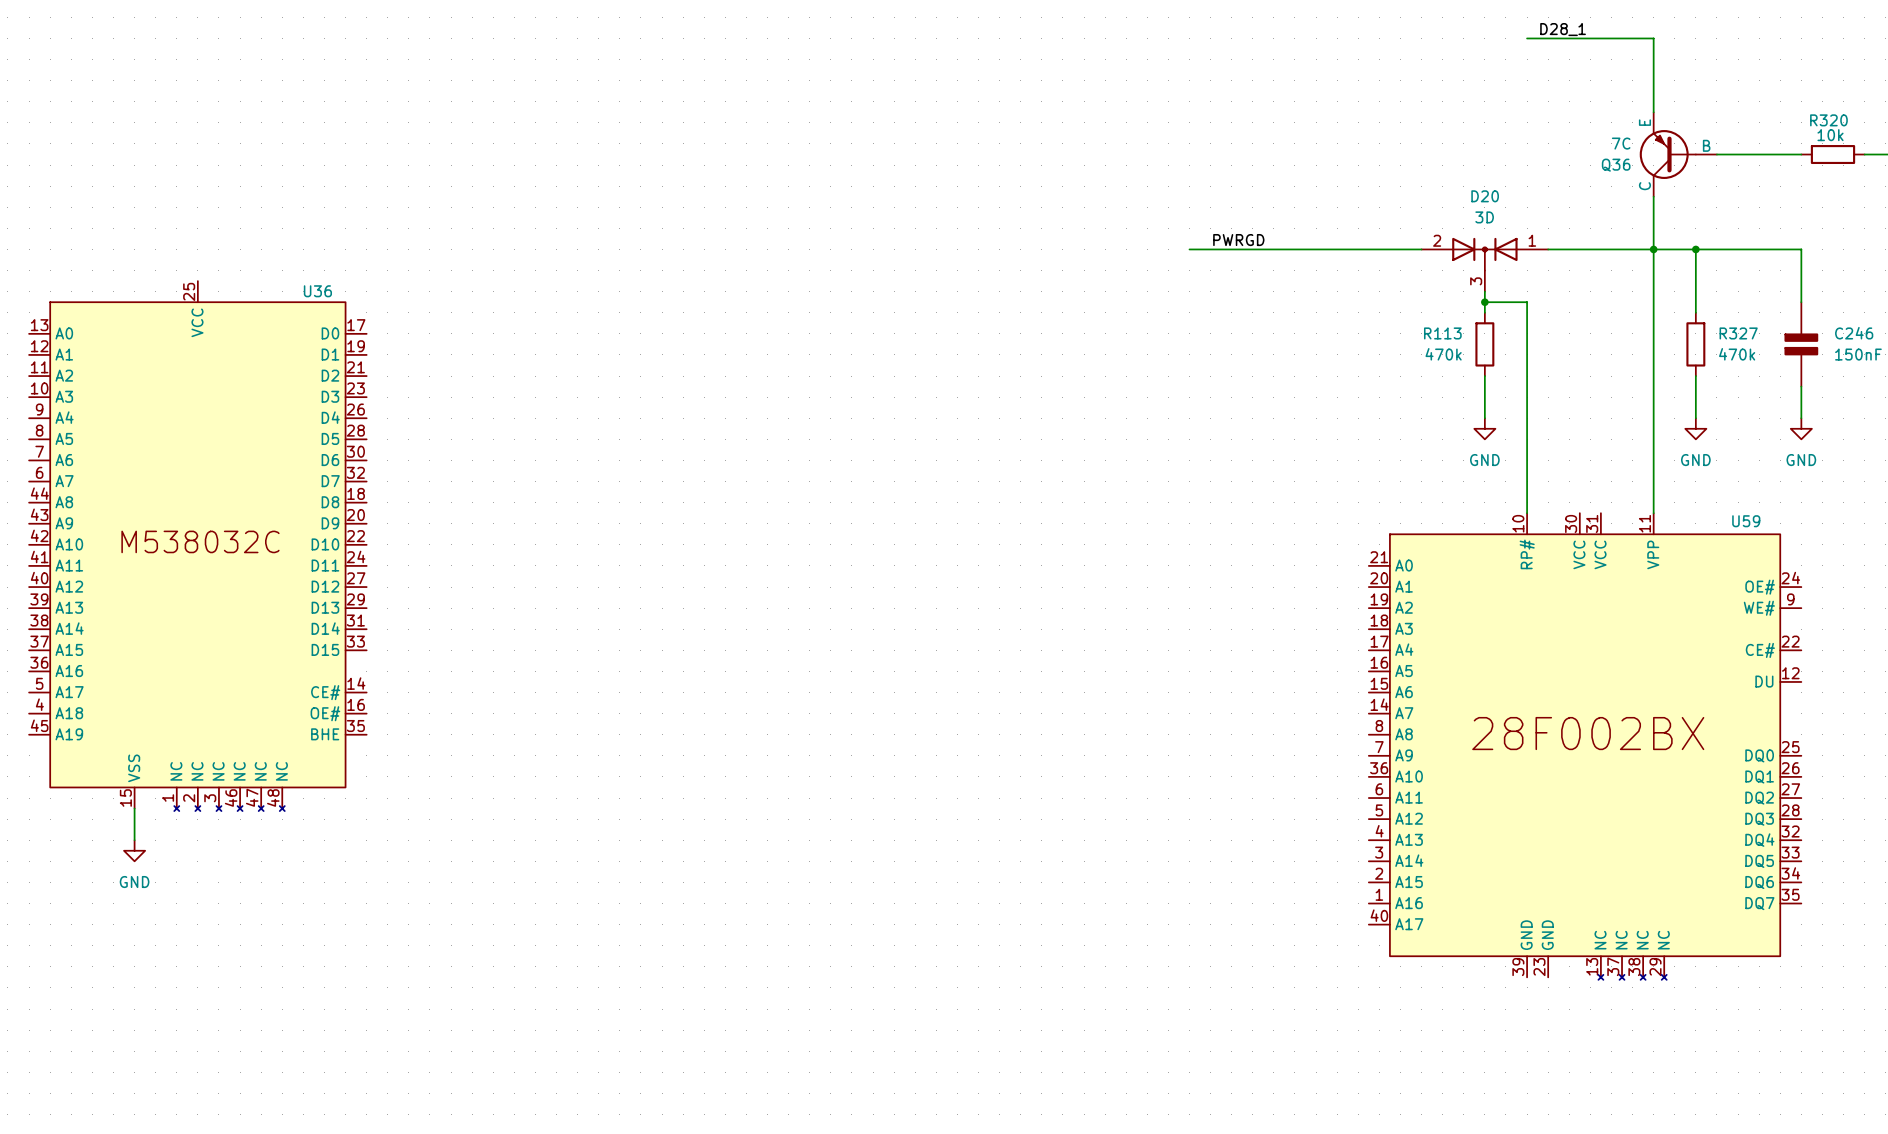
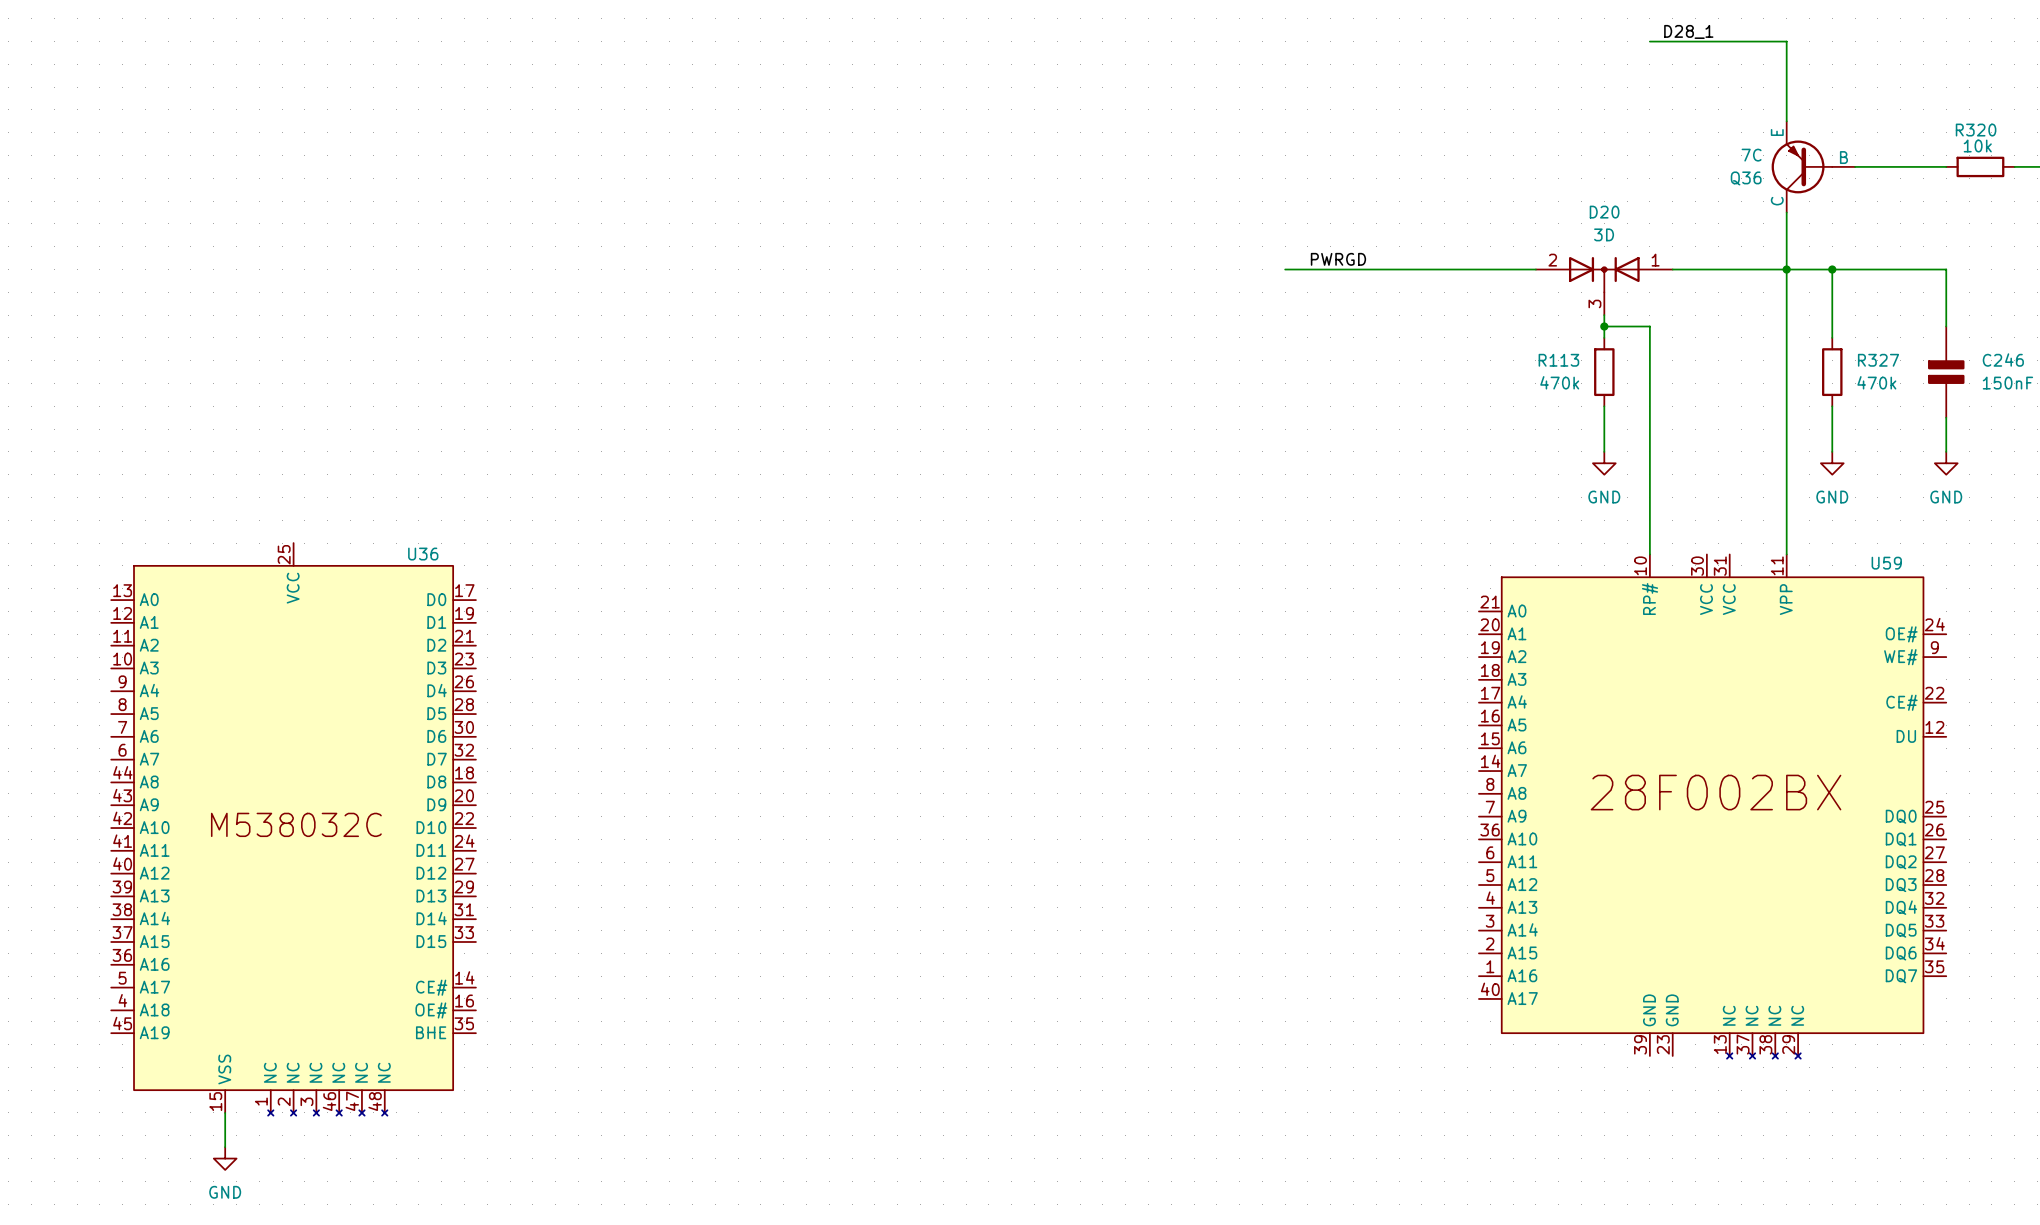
U36 position: (197, 546) -> (293, 829)
power symbol: GND (134, 850) -> none
wire: none -> (225, 1112) (225, 1147)
power symbol: none -> GND (225, 1158)

